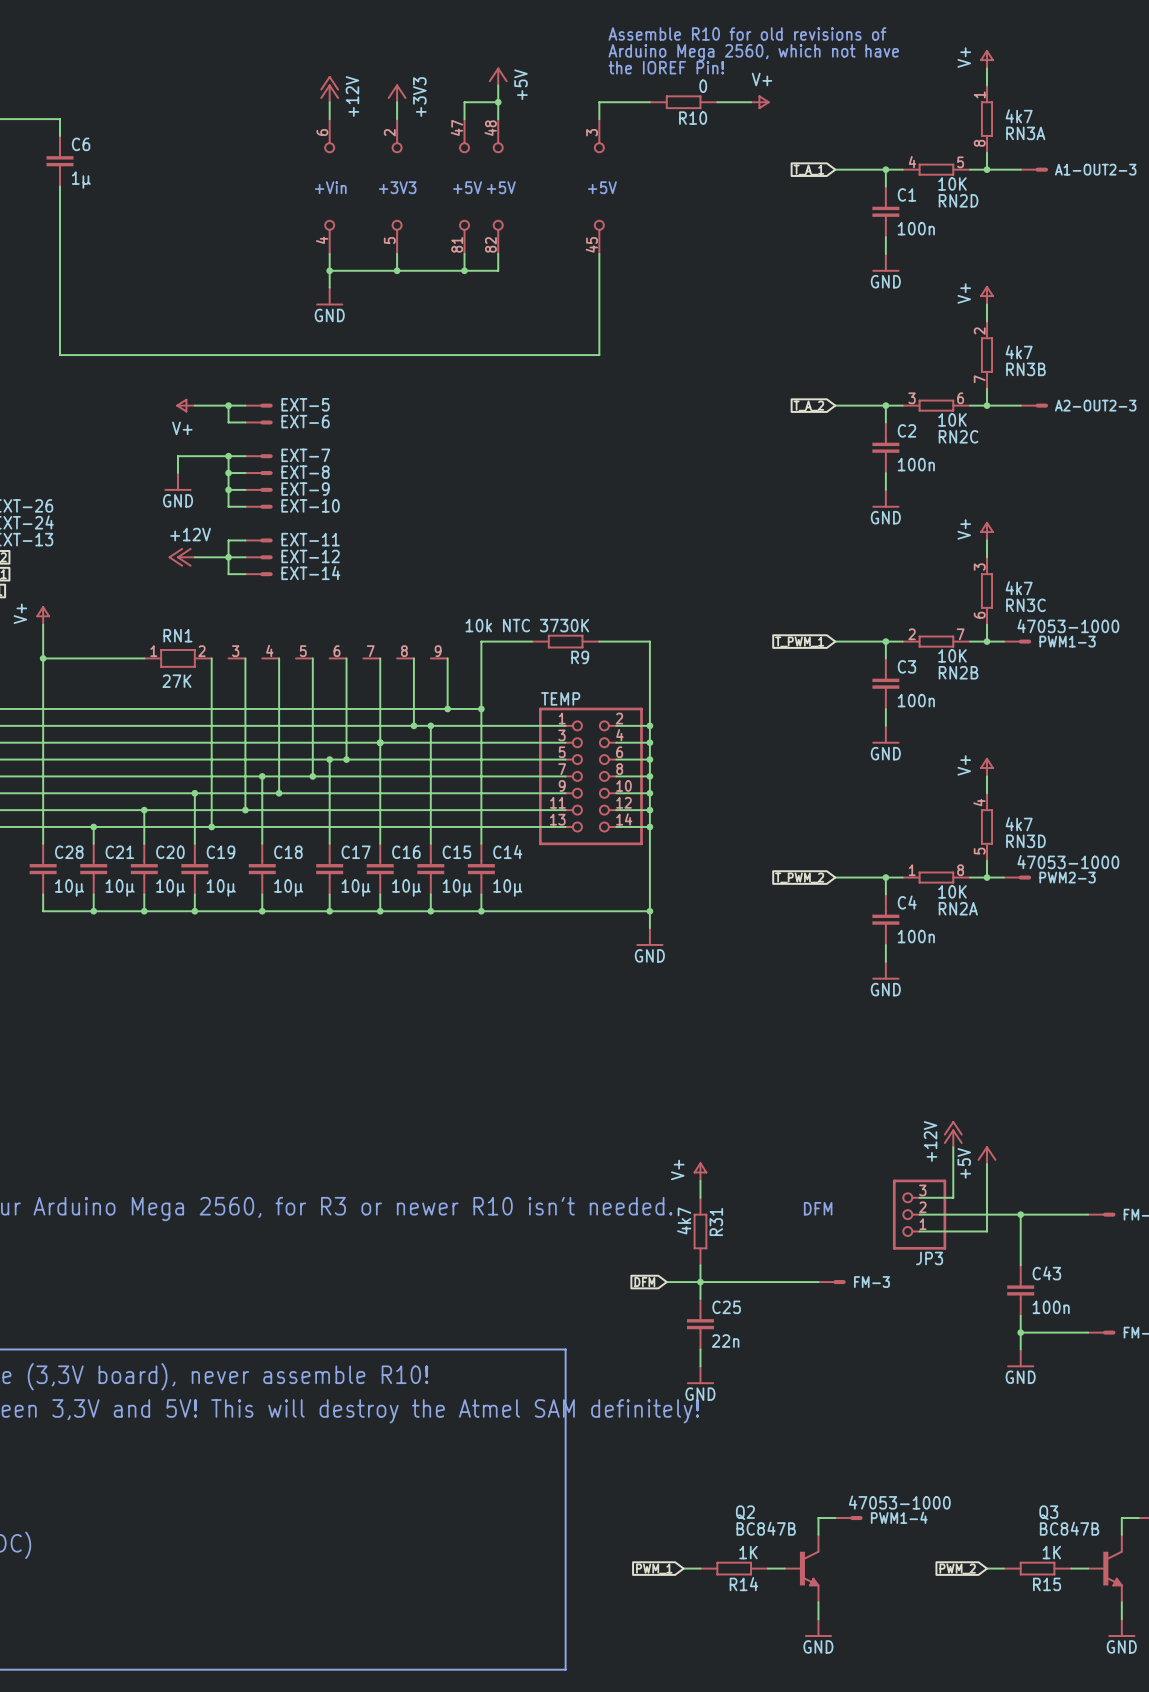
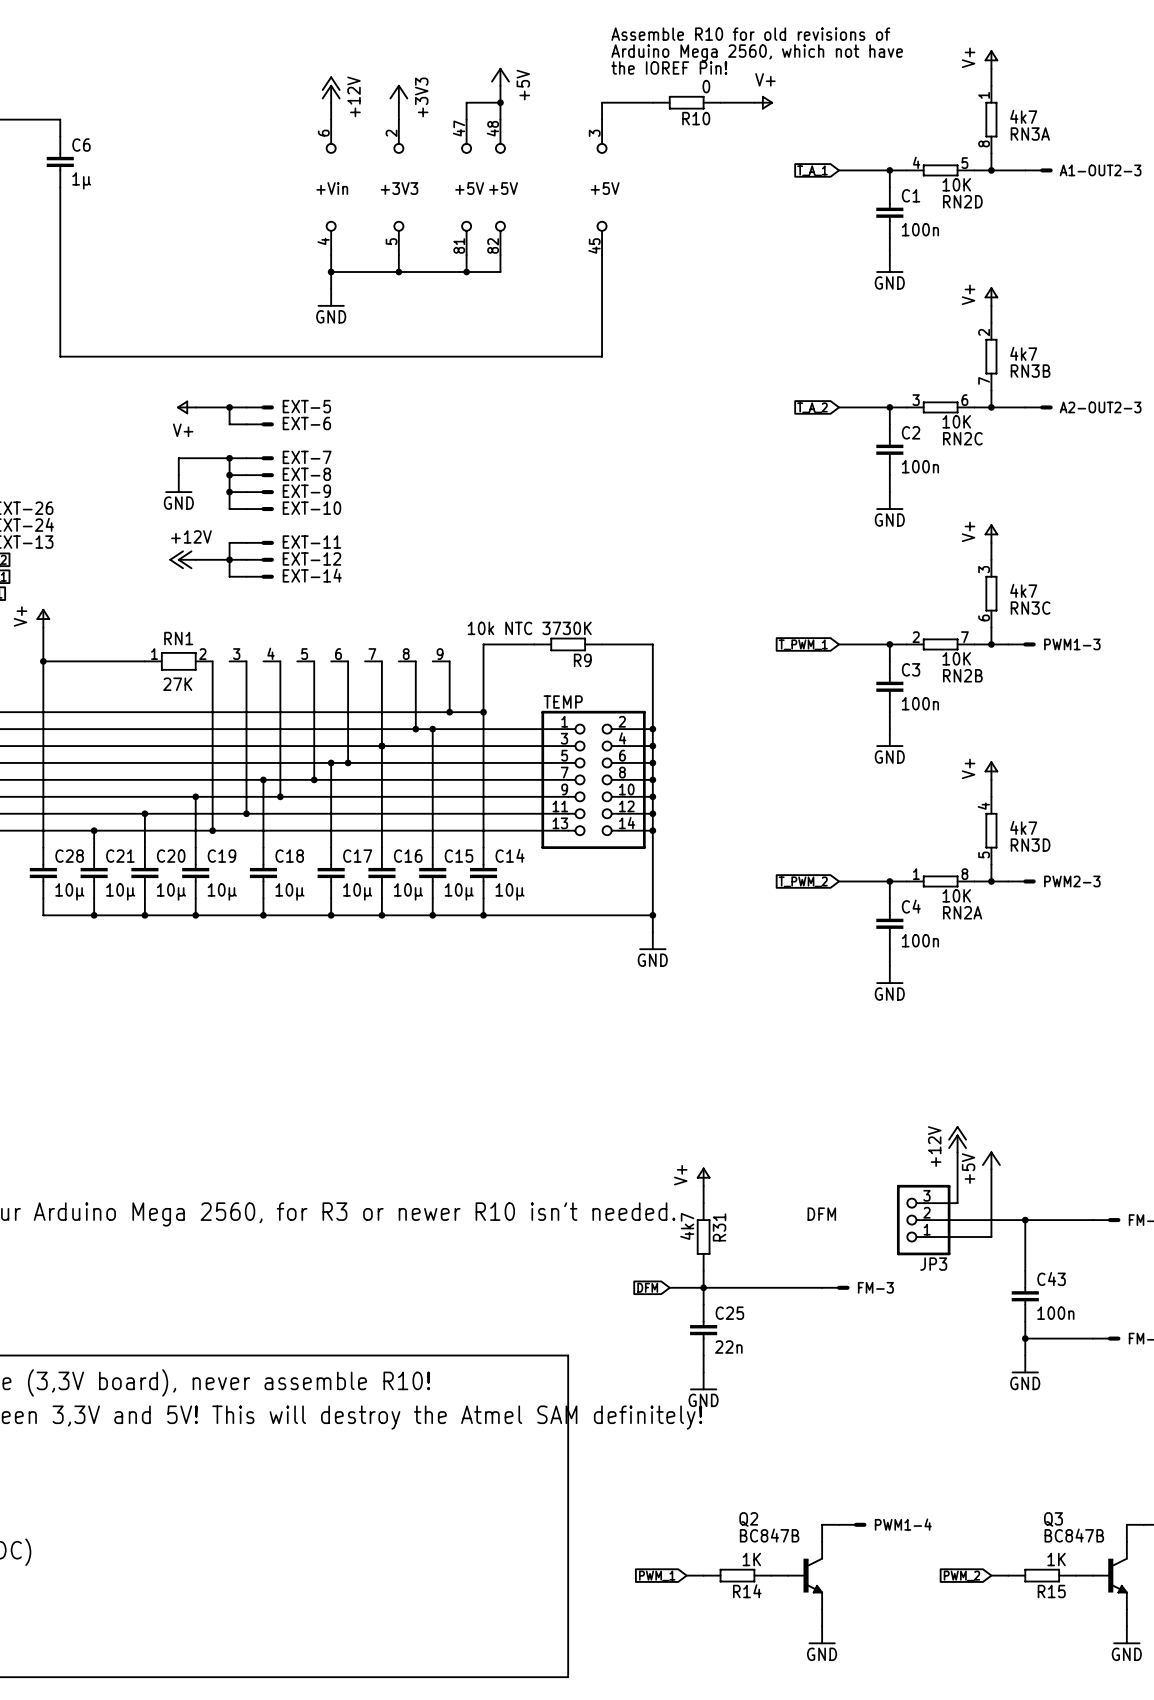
PWM1-3 value: 47053-1000 (1068, 626) -> none
PWM2-3 value: 47053-1000 (1068, 862) -> none
PWM1-4 value: 47053-1000 (899, 1502) -> none

